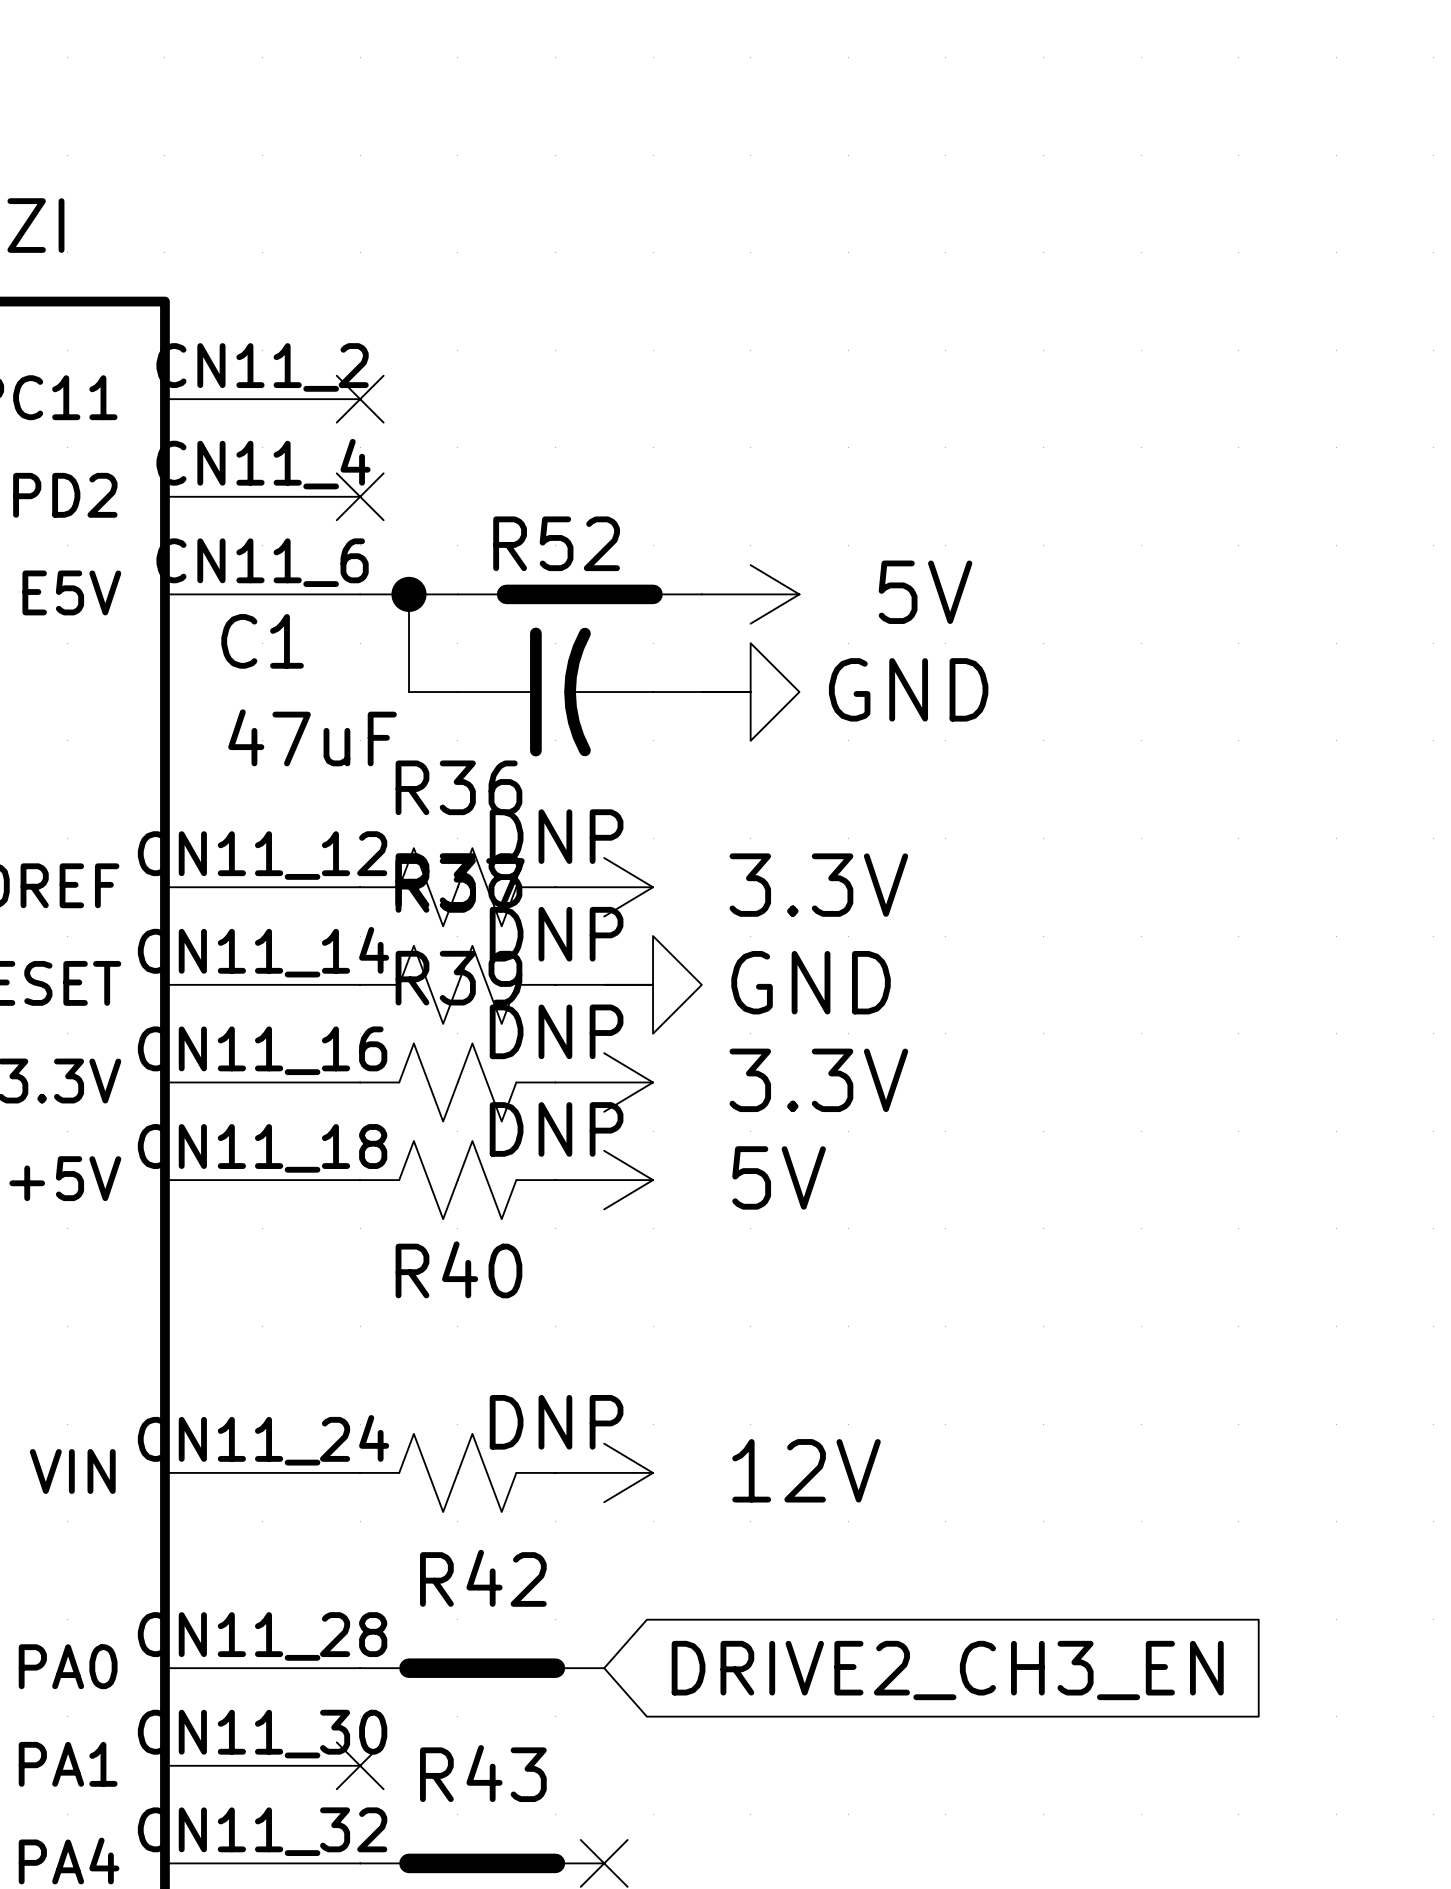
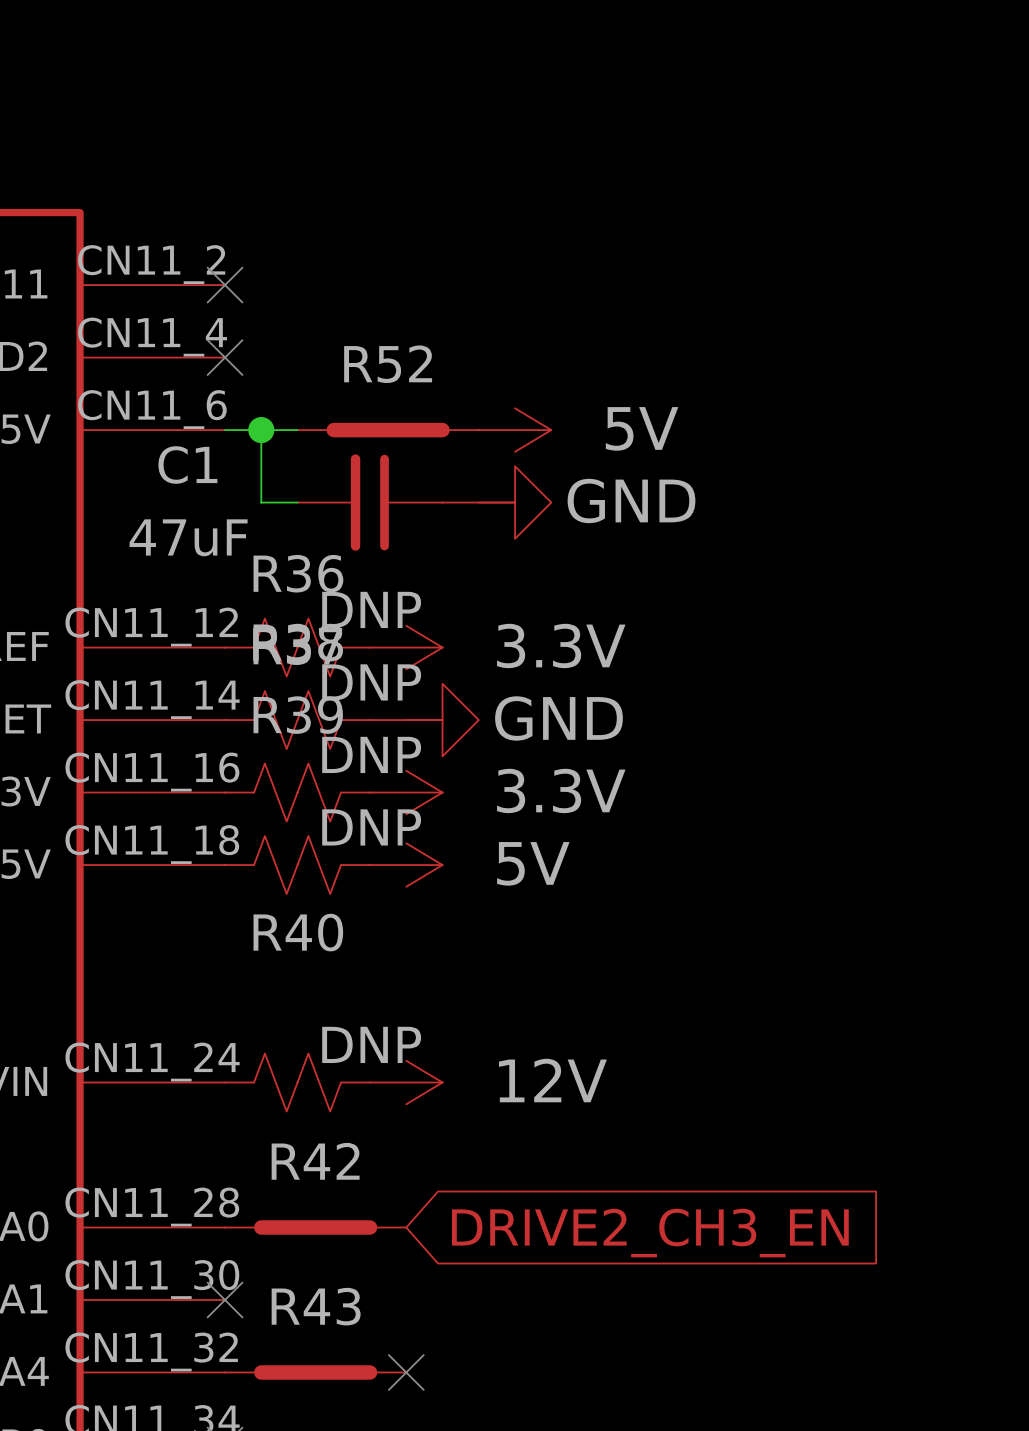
R52 name position: R52 (556, 543) -> R52 (388, 364)
C1 symbol: [457, 627, 654, 757] -> [297, 454, 443, 551]
C1 name position: C1 (262, 641) -> C1 (187, 464)

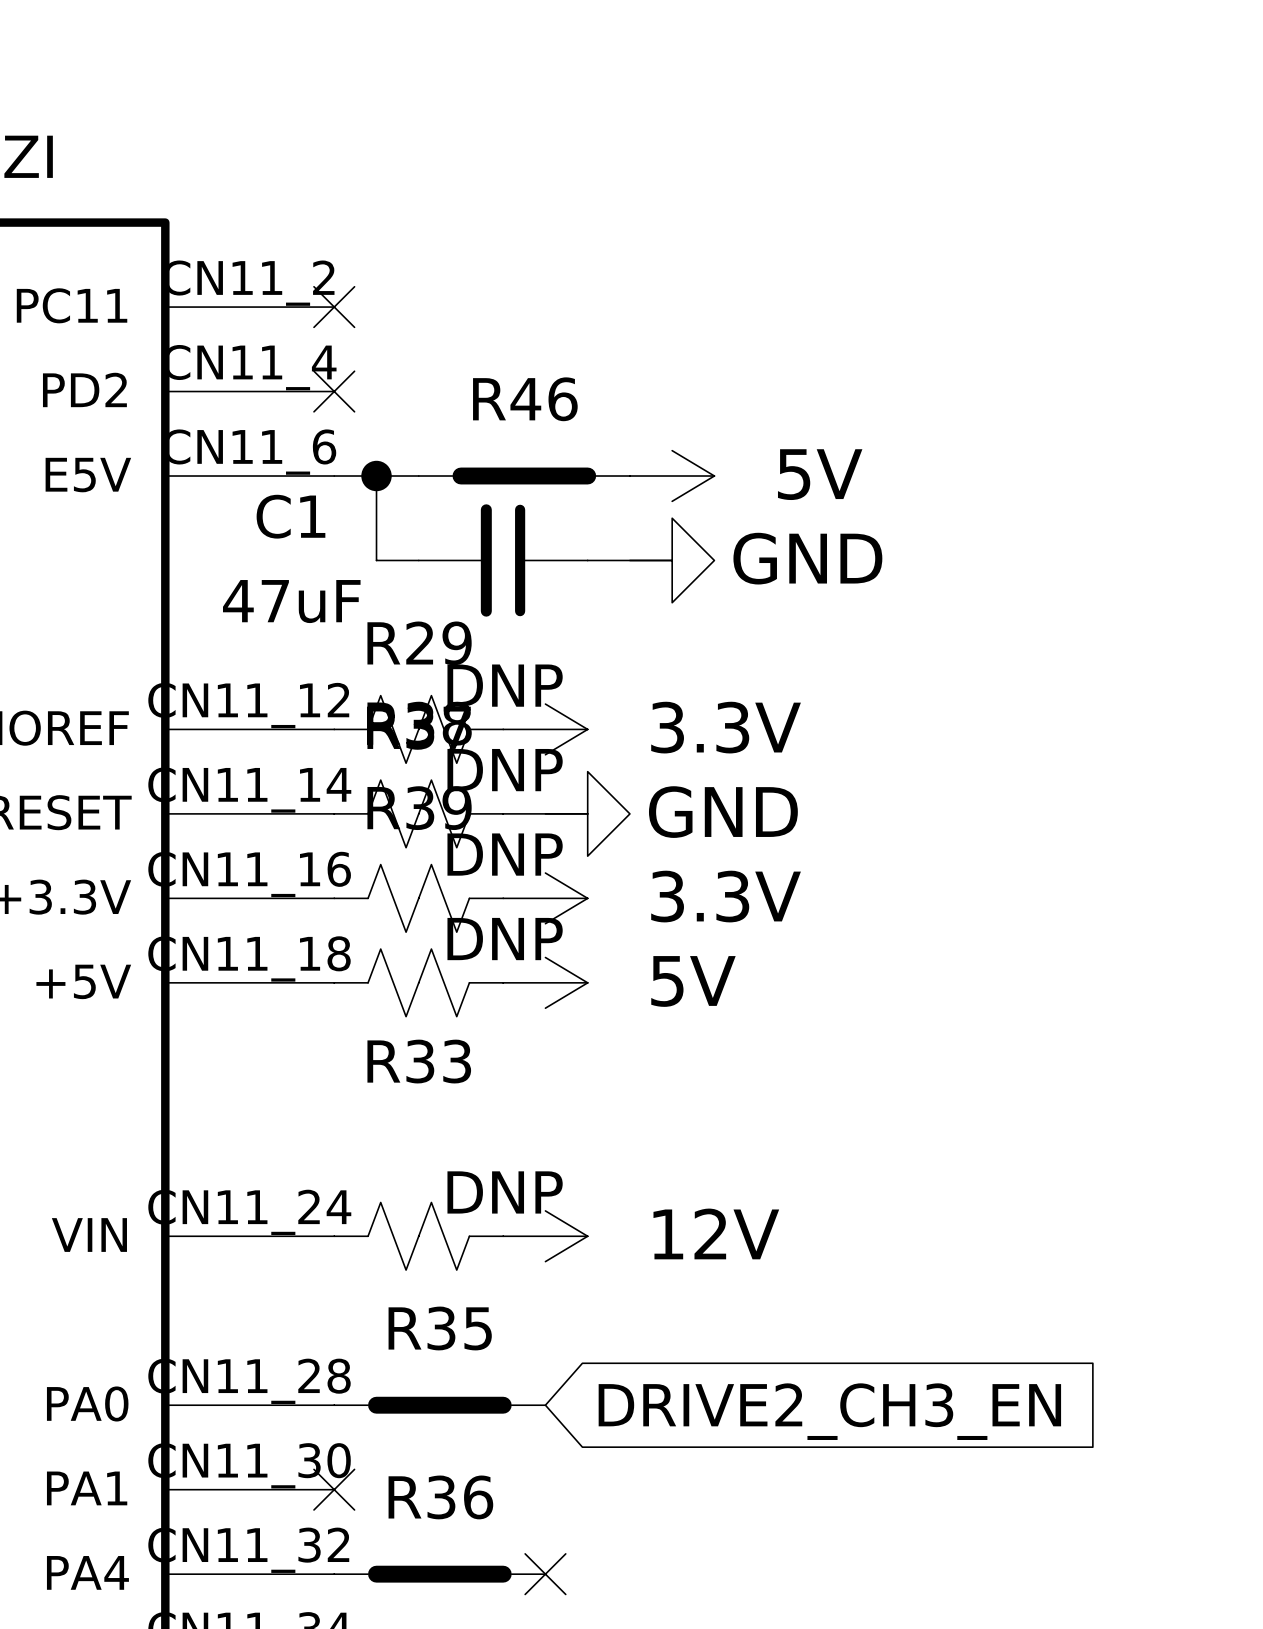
R52 name: R52 (388, 364) -> R46 (525, 399)
R36 name: R36 (298, 573) -> R29 (419, 643)
R40 name: R40 (298, 932) -> R33 (419, 1061)
R42 name: R42 (315, 1161) -> R35 (440, 1328)
R43 name: R43 (316, 1306) -> R36 (440, 1497)

